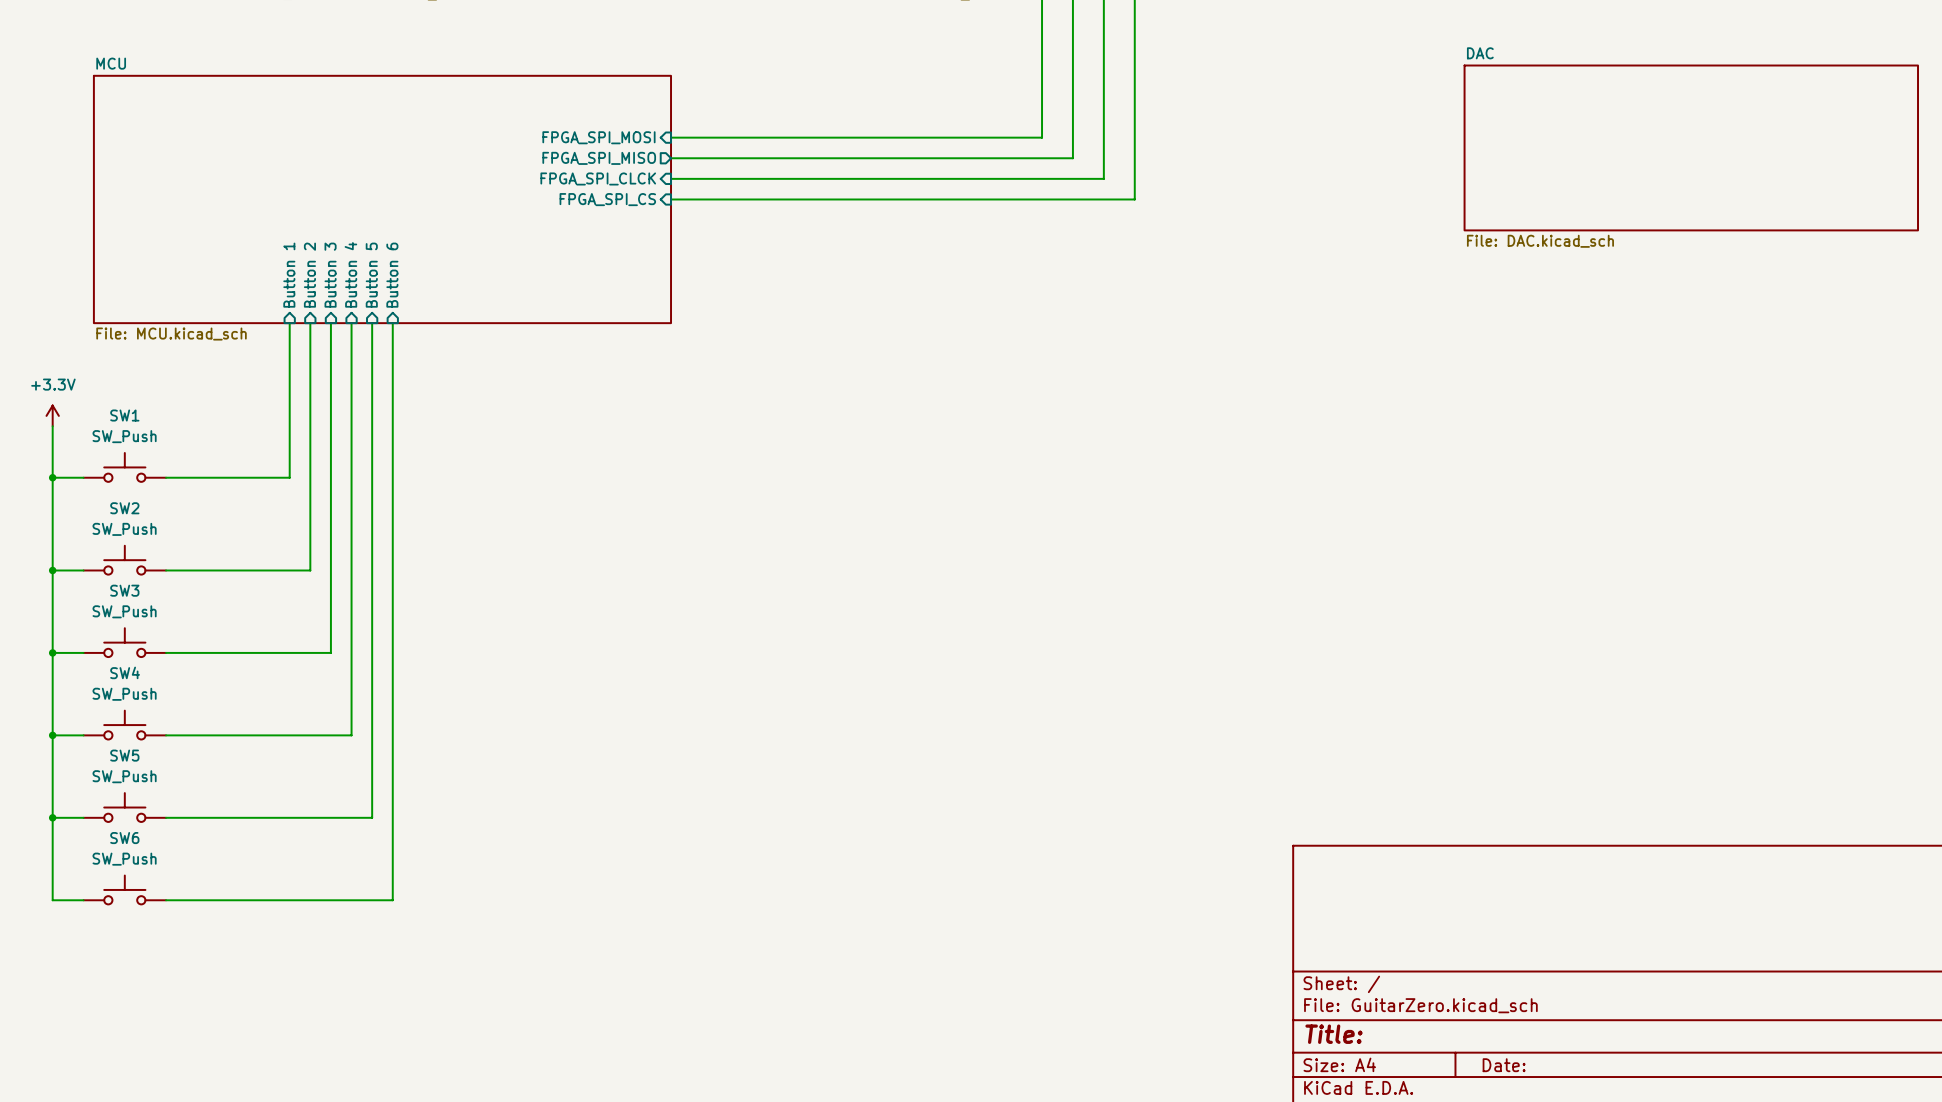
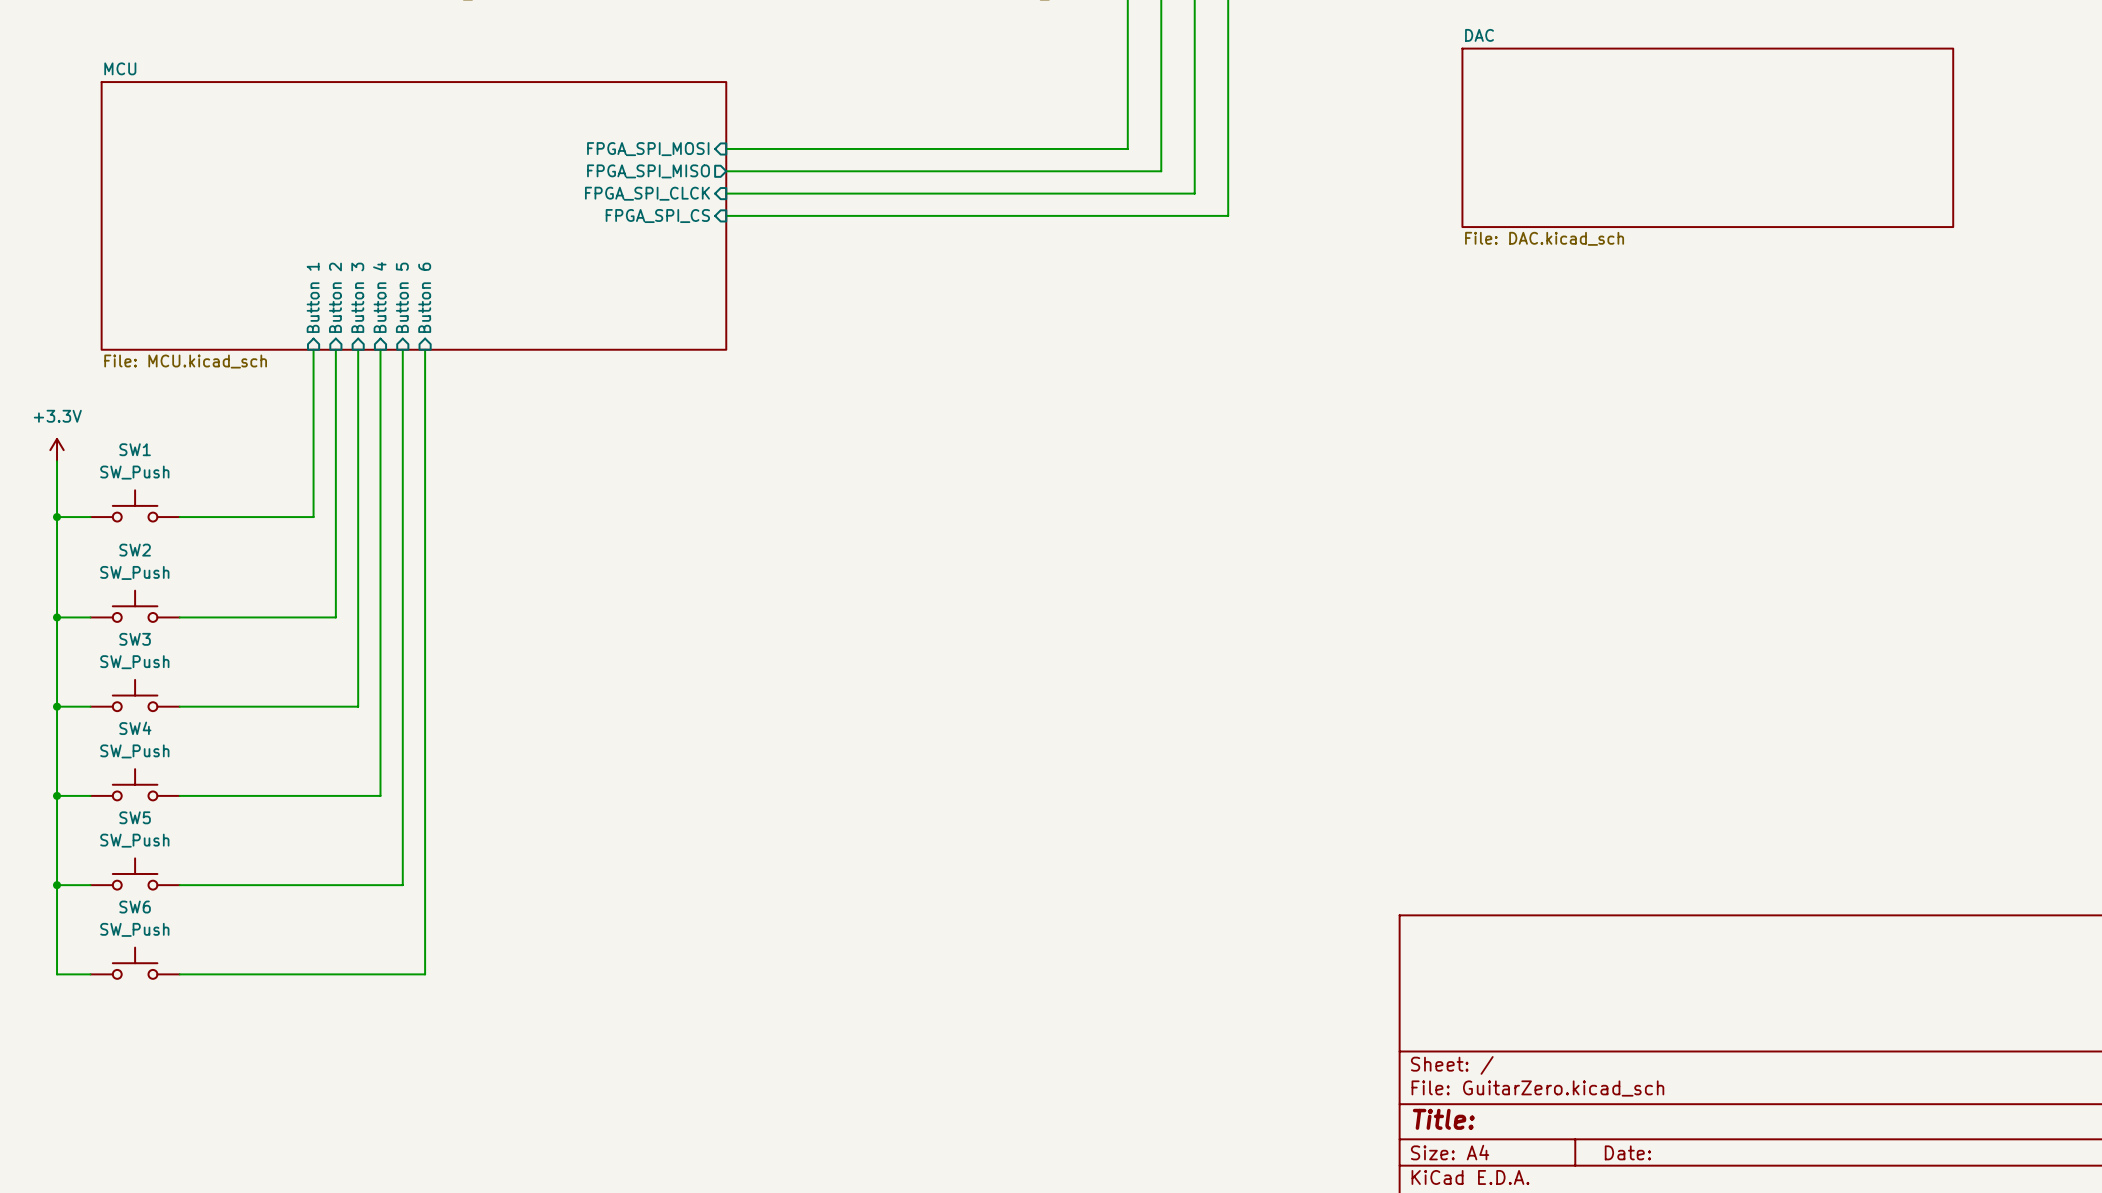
sheet DAC position: (1691, 147) -> (1707, 137)

